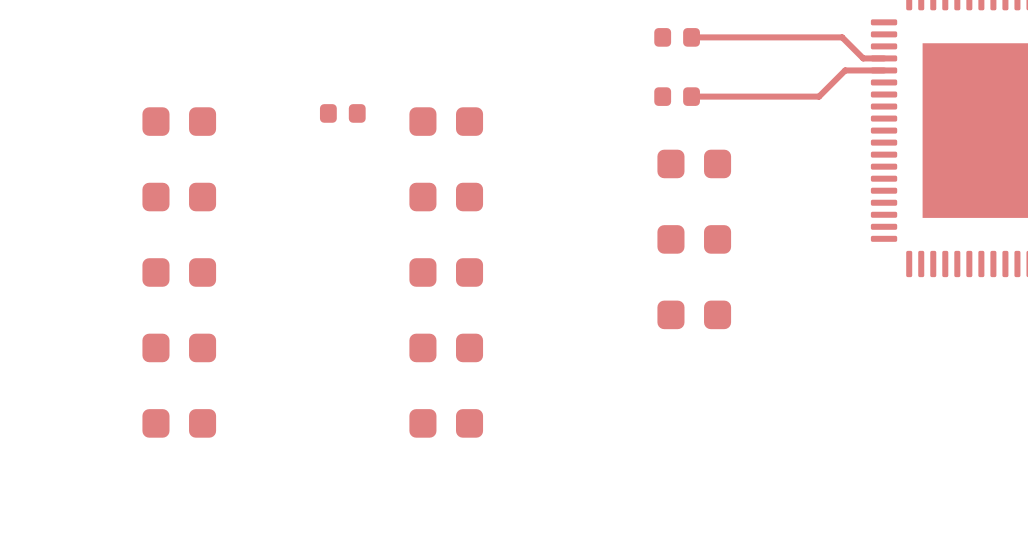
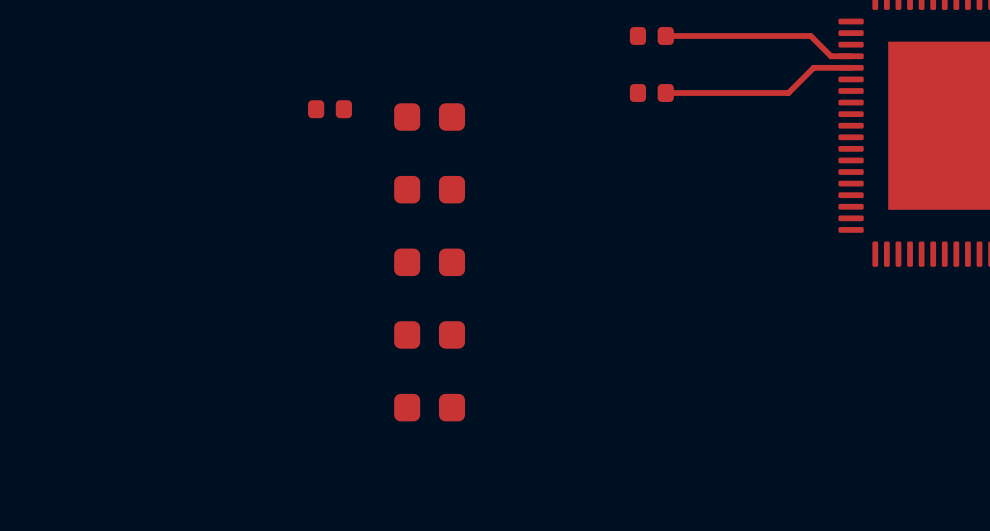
part: (179, 121) -> none
part: (694, 163) -> none
part: (179, 197) -> none
part: (694, 239) -> none
part: (179, 272) -> none
part: (694, 314) -> none
part: (179, 347) -> none
part: (179, 423) -> none

